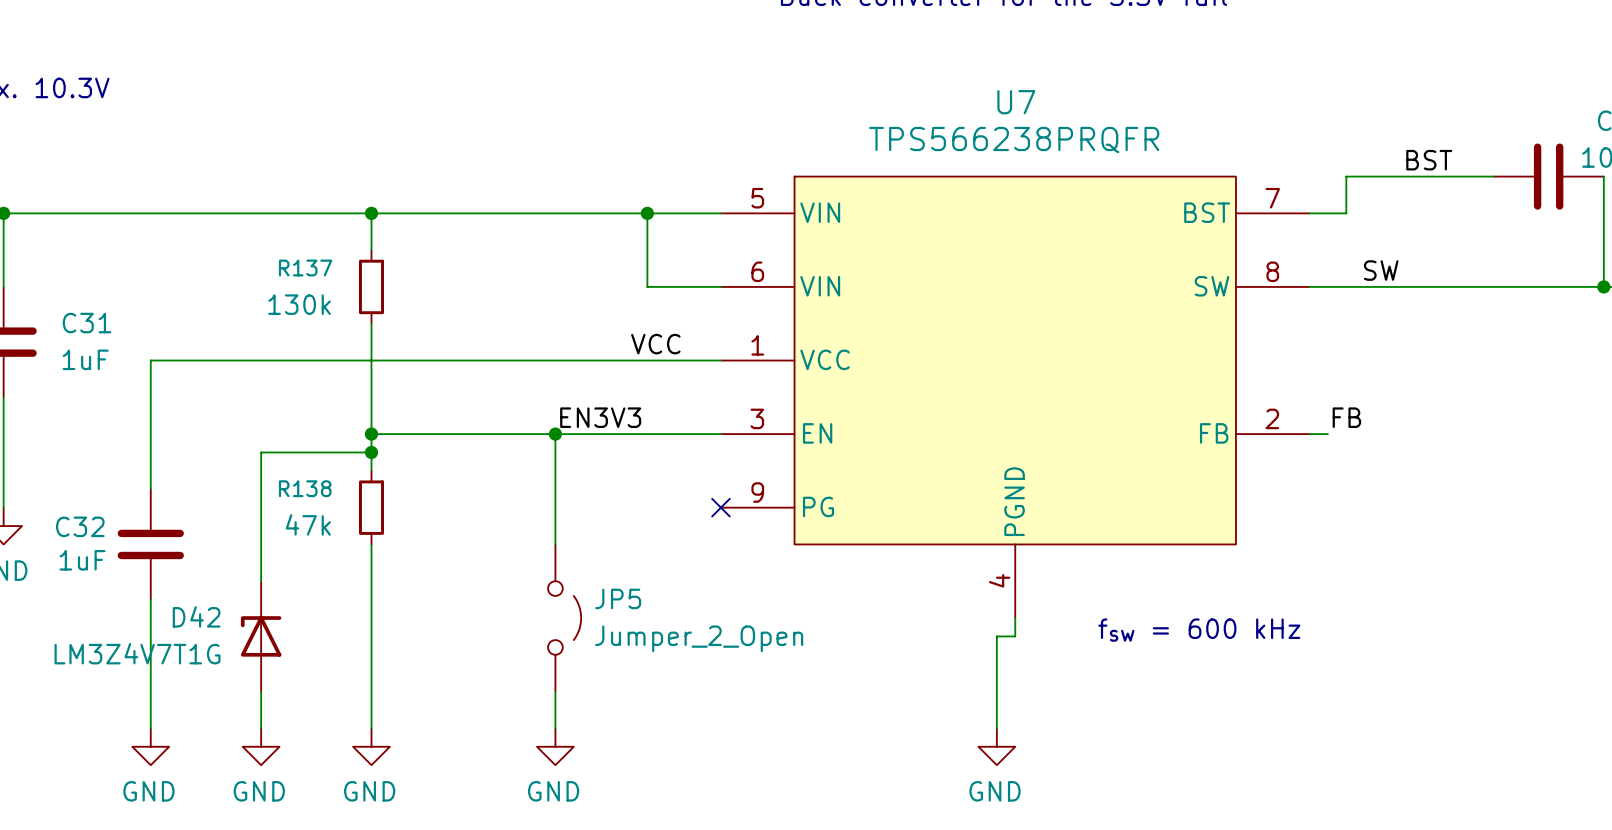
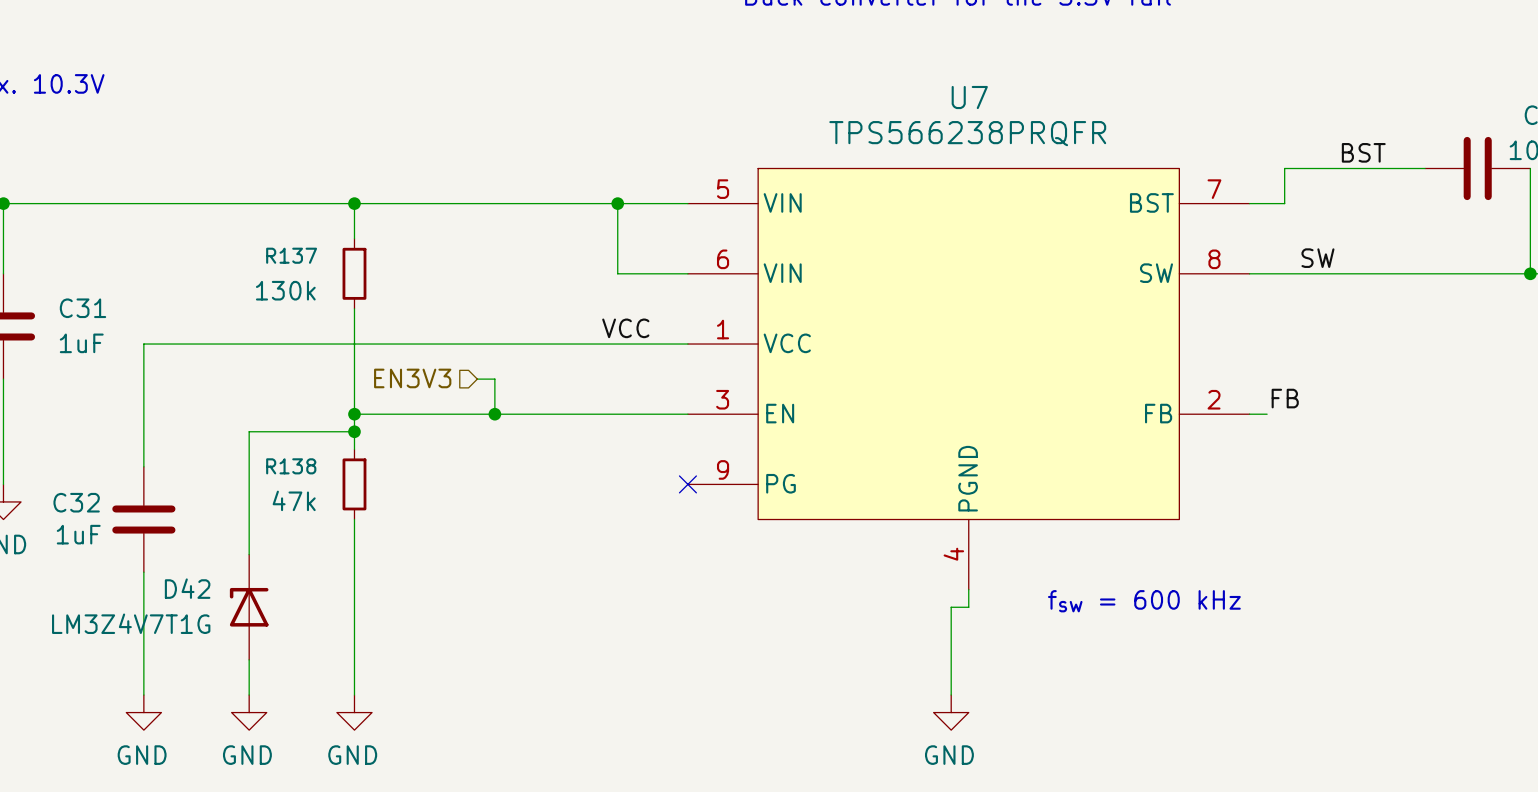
hierarchical label: none -> EN3V3 (412, 378)
wire: none -> (477, 379) (494, 379) (494, 414)
label: EN3V3 (600, 417) -> none
wire: (555, 434) (555, 544) -> none
junction position: (555, 434) -> (494, 414)
JP5: Jumper_2_Open (564, 618) -> none
wire: (555, 691) (555, 728) -> none
power symbol: GND (555, 746) -> none

